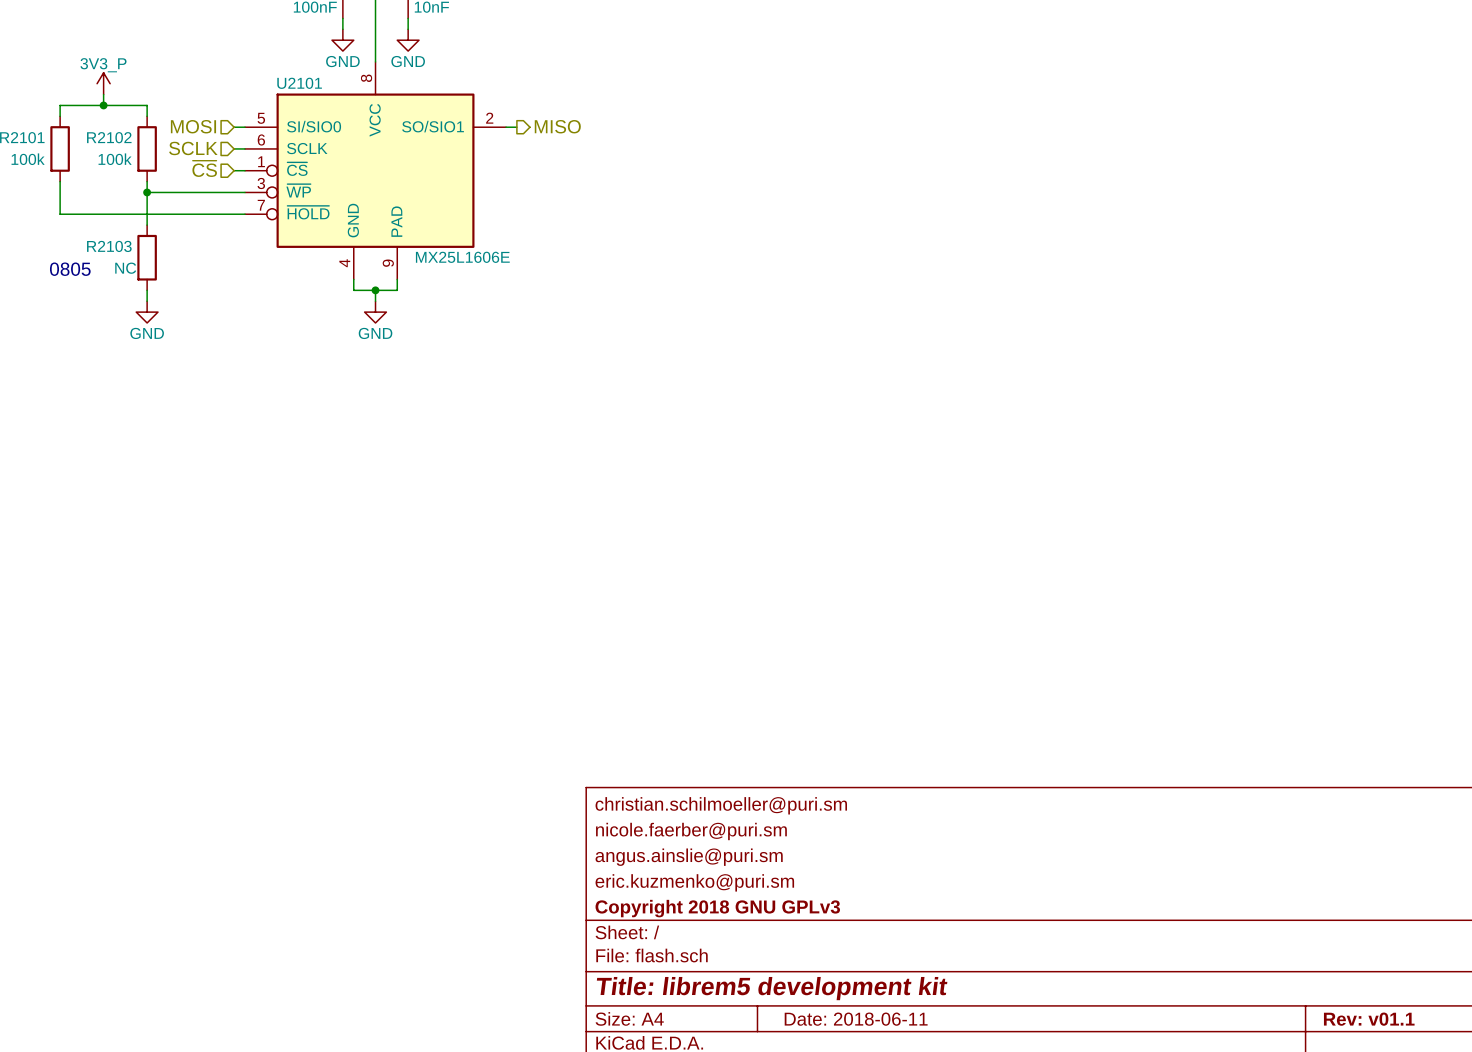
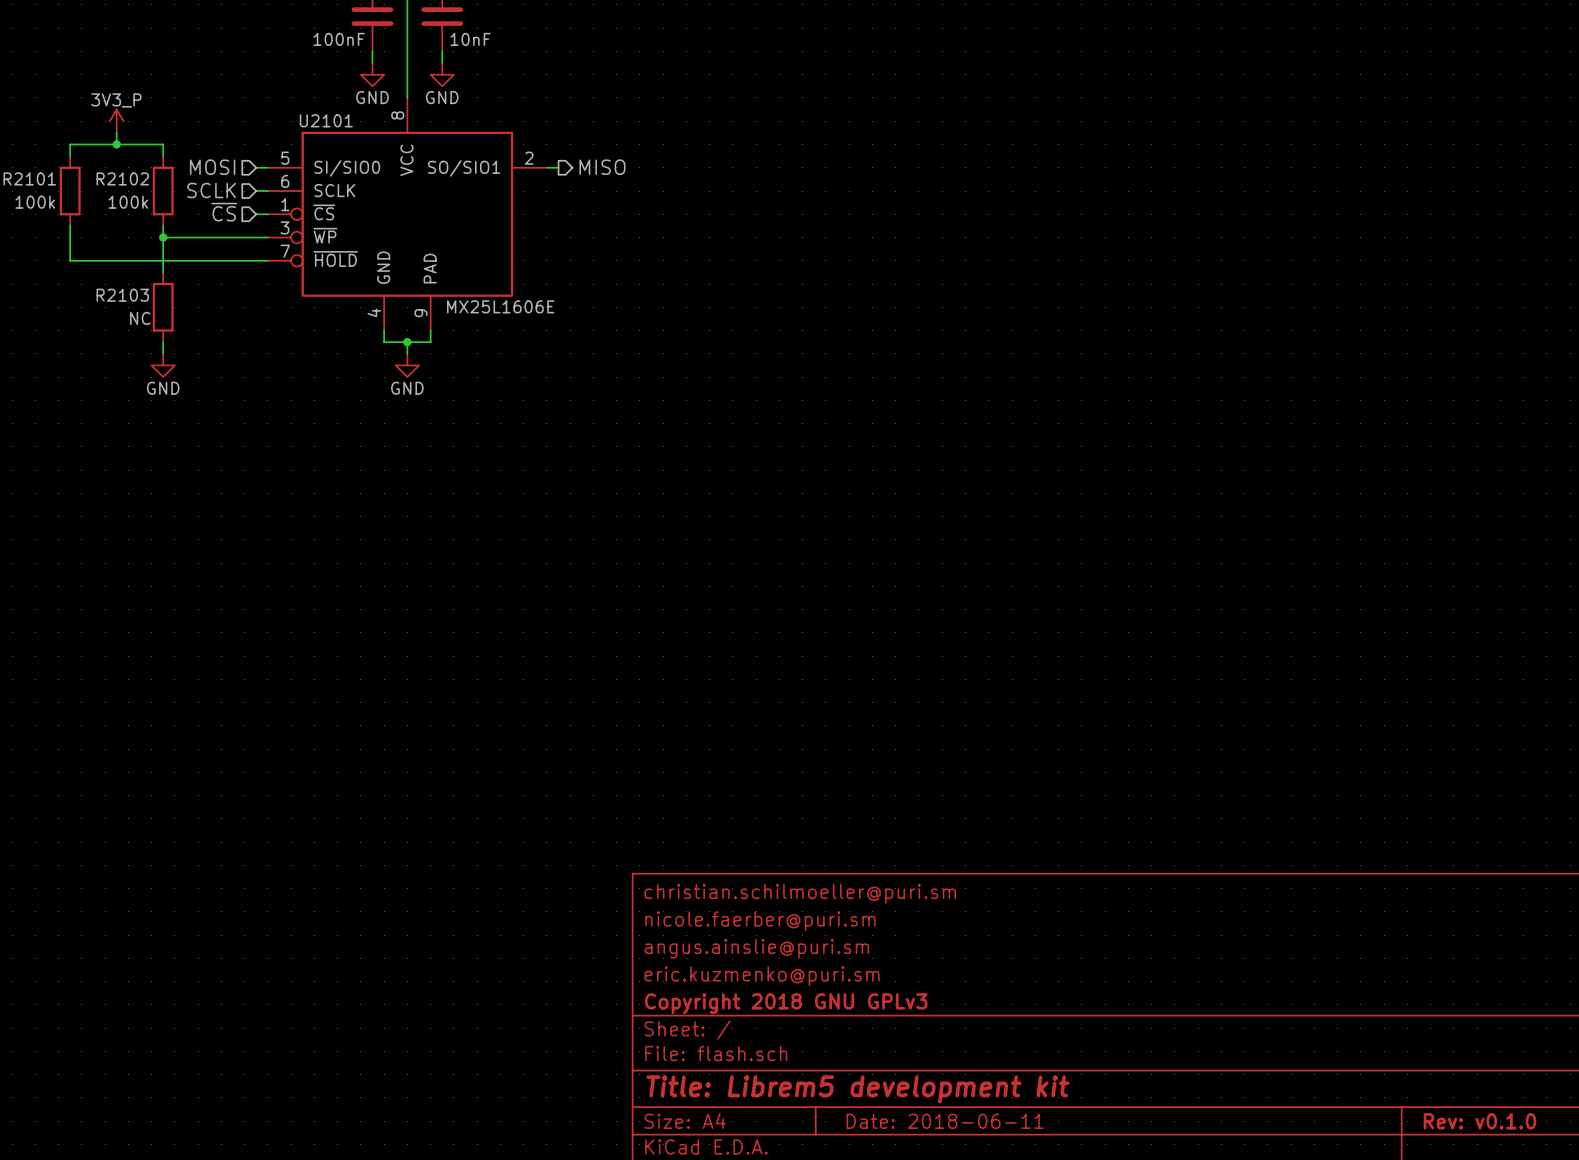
text: 0805 (70, 269) -> none
title block: Title: librem5 development kit (772, 988) -> Title: Librem5 development kit (857, 1089)
title block: Rev: v01.1 (1369, 1019) -> Rev: v0.1.0 (1479, 1121)

